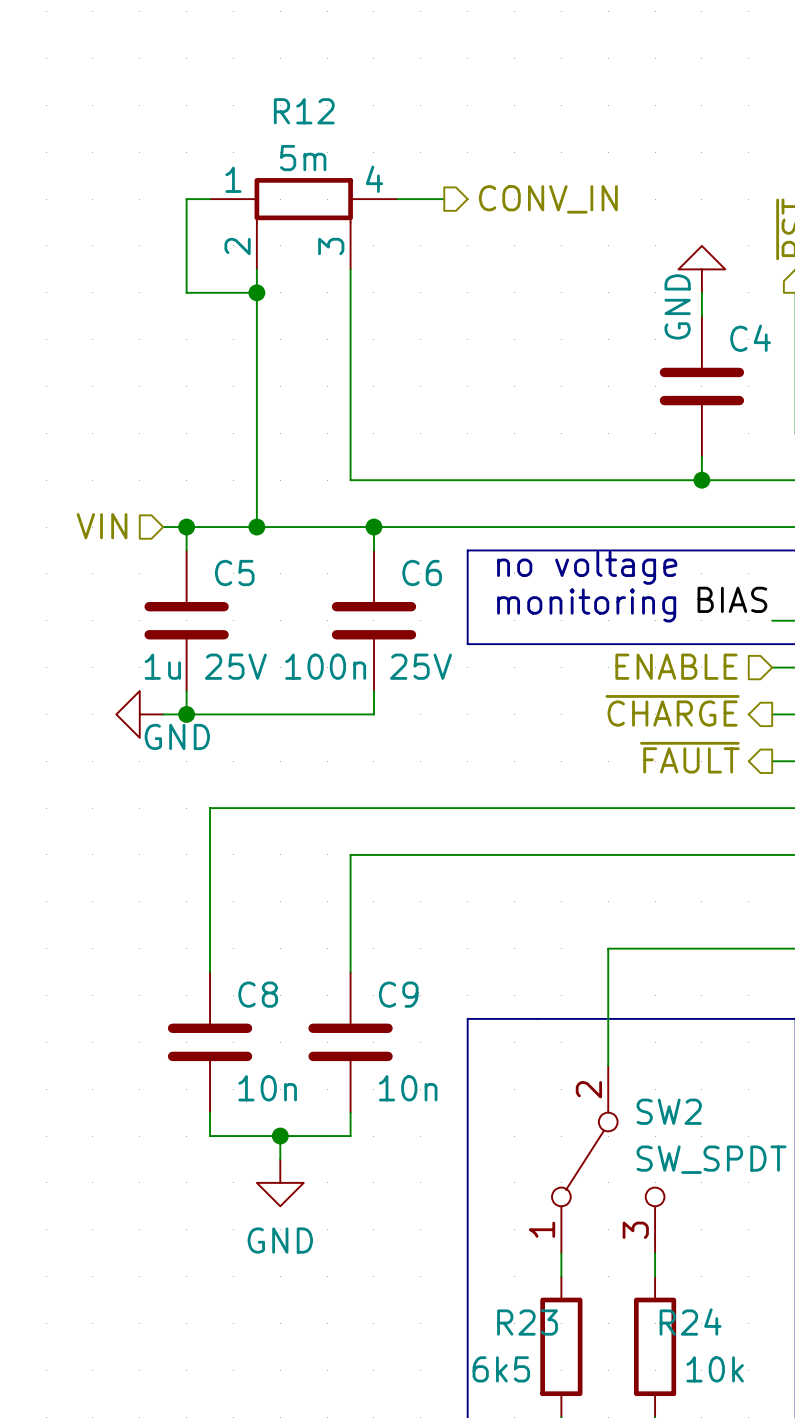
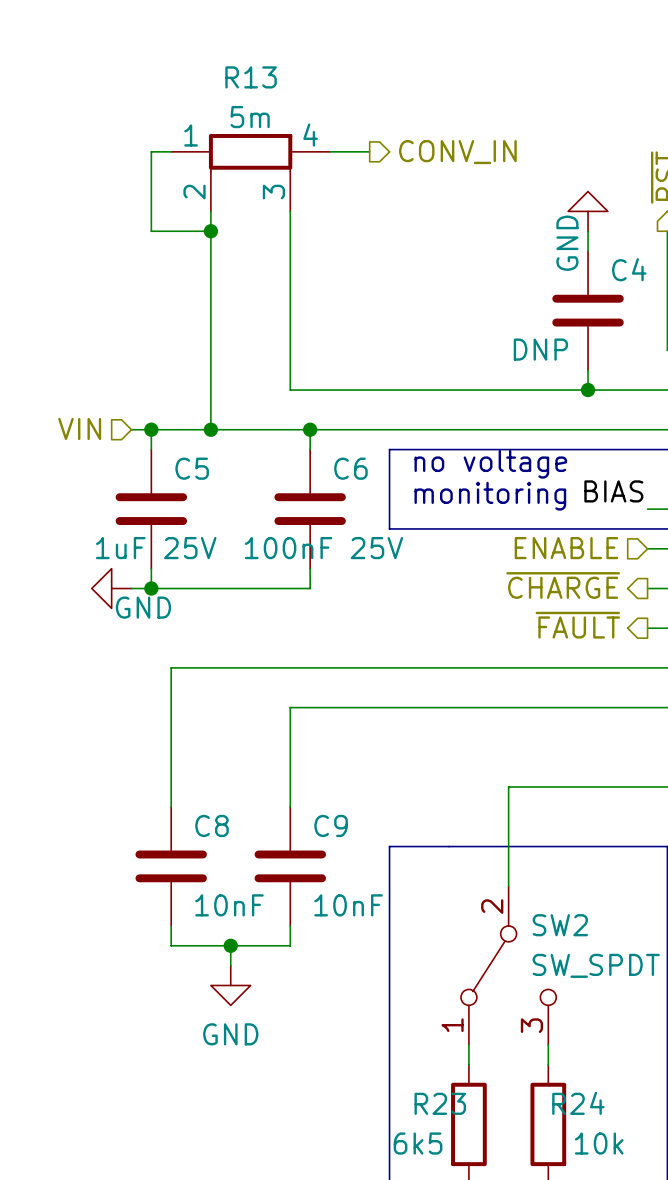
R12 name: R12 (304, 111) -> R13 (251, 77)
C4 value: none -> DNP (540, 349)
C5 value: 1u 25V (205, 666) -> 1uF 25V (156, 548)
C6 value: 100n 25V (368, 666) -> 100nF 25V (323, 548)
C8 value: 10n (267, 1088) -> 10nF (229, 905)
C9 value: 10n (408, 1088) -> 10nF (348, 905)

